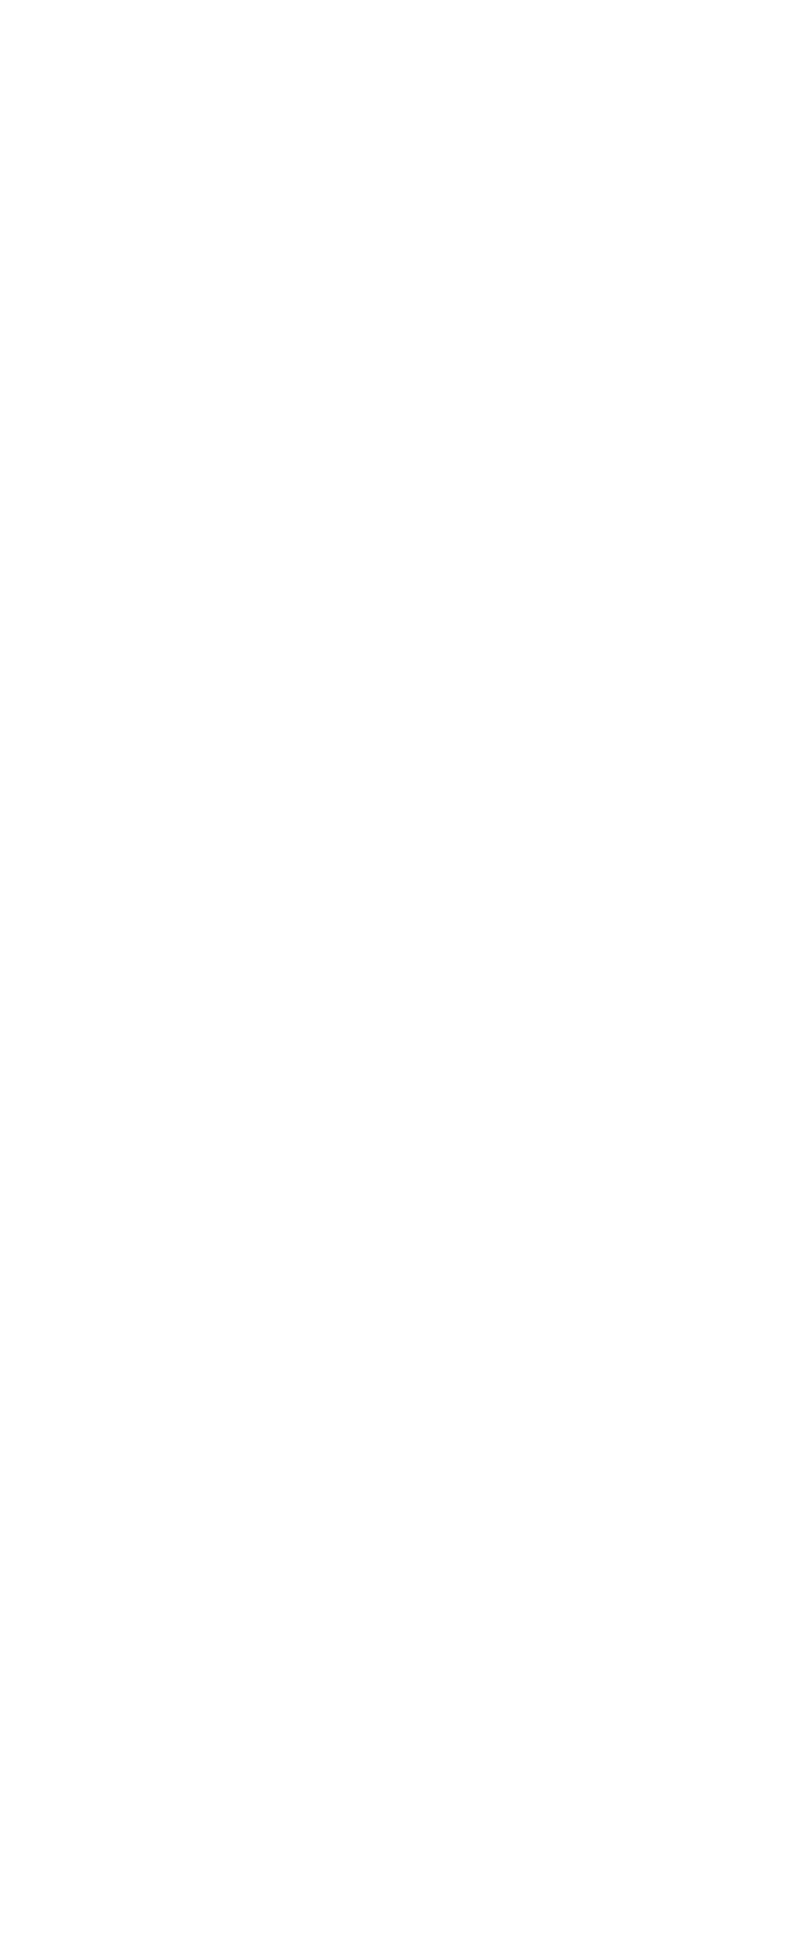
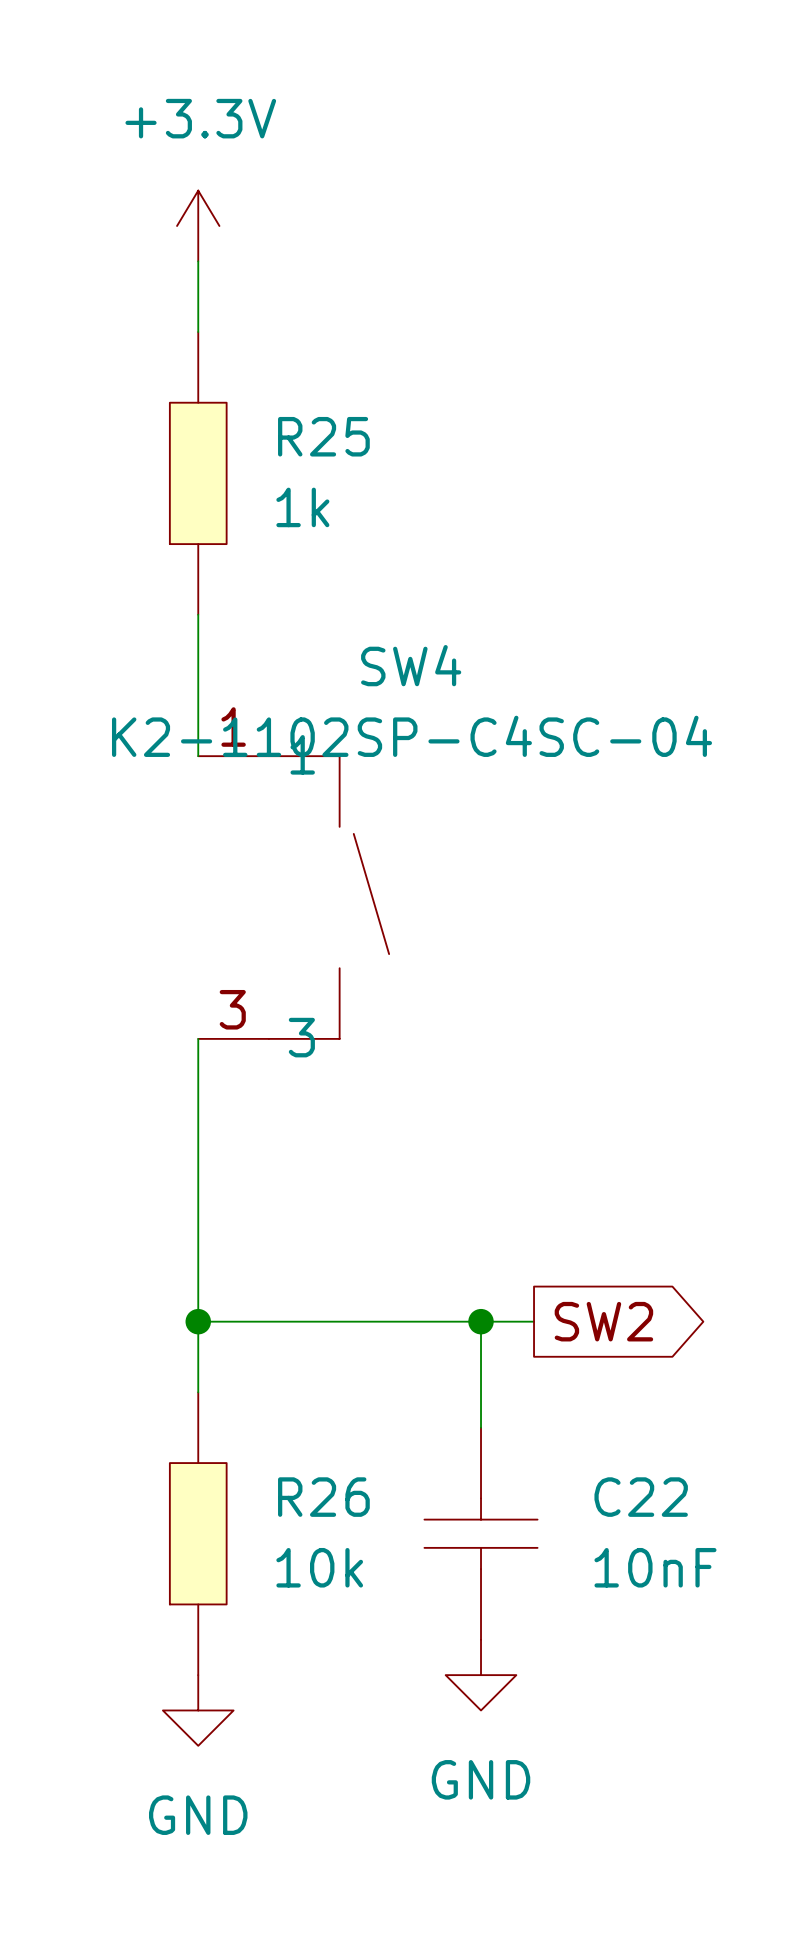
power symbol: none -> +3.3V (198, 225)
wire: none -> (198, 261) (198, 332)
R25: none -> 1k (198, 473)
wire: none -> (198, 614) (198, 756)
SW4: none -> K2-1102SP-C4SC-04 (293, 897)
wire: none -> (198, 1038) (198, 1392)
wire: none -> (198, 1321) (534, 1321)
junction: none -> (198, 1321)
wire: none -> (481, 1321) (481, 1427)
junction: none -> (481, 1321)
global label: none -> SW2 (603, 1321)
R26: none -> 10k (198, 1533)
C22: none -> 10nF (481, 1533)
power symbol: none -> GND (481, 1675)
power symbol: none -> GND (198, 1710)

